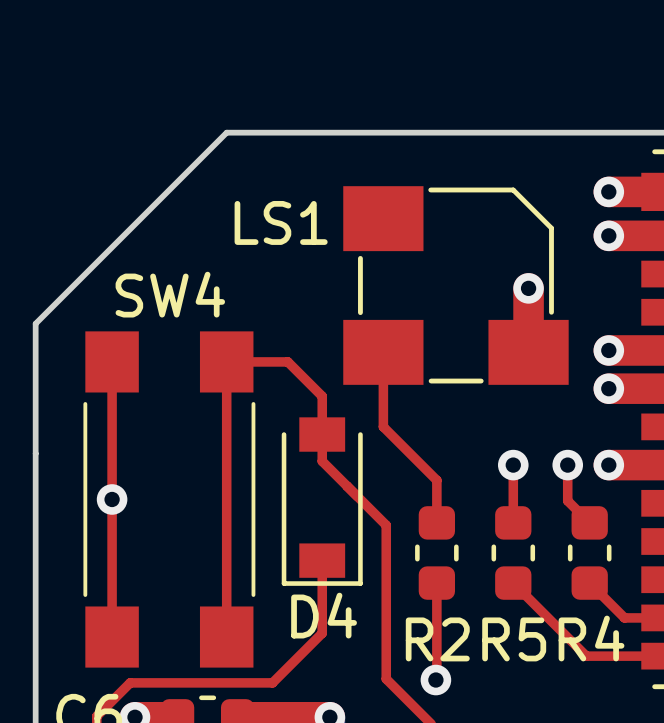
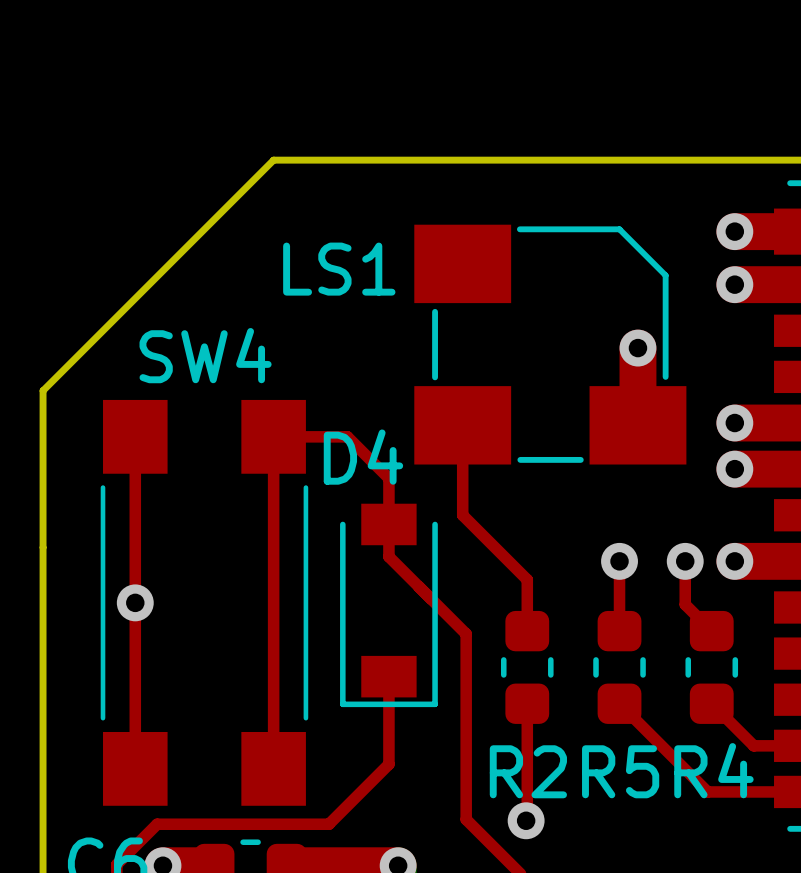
D4 name position: D4 (324, 615) -> D4 (363, 457)

